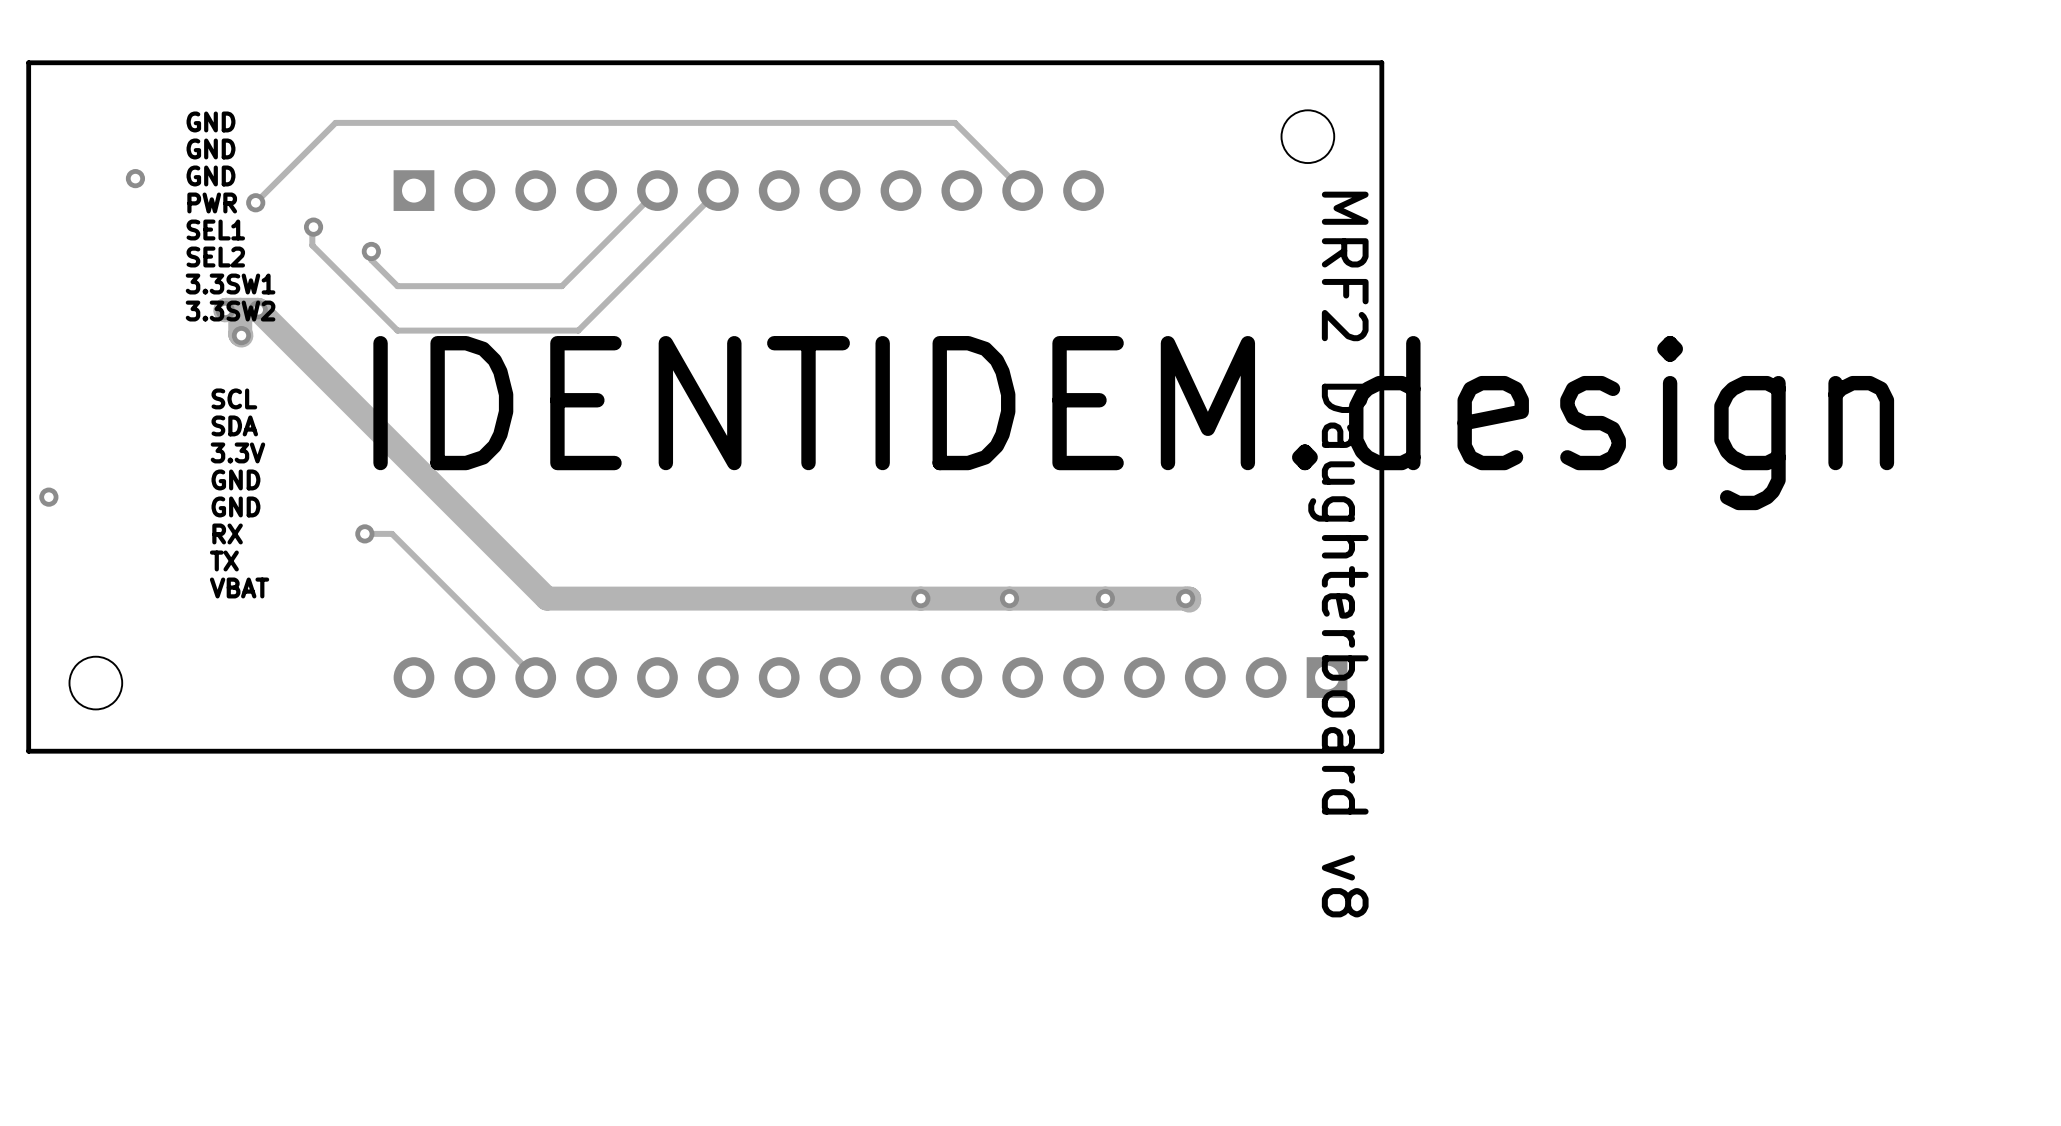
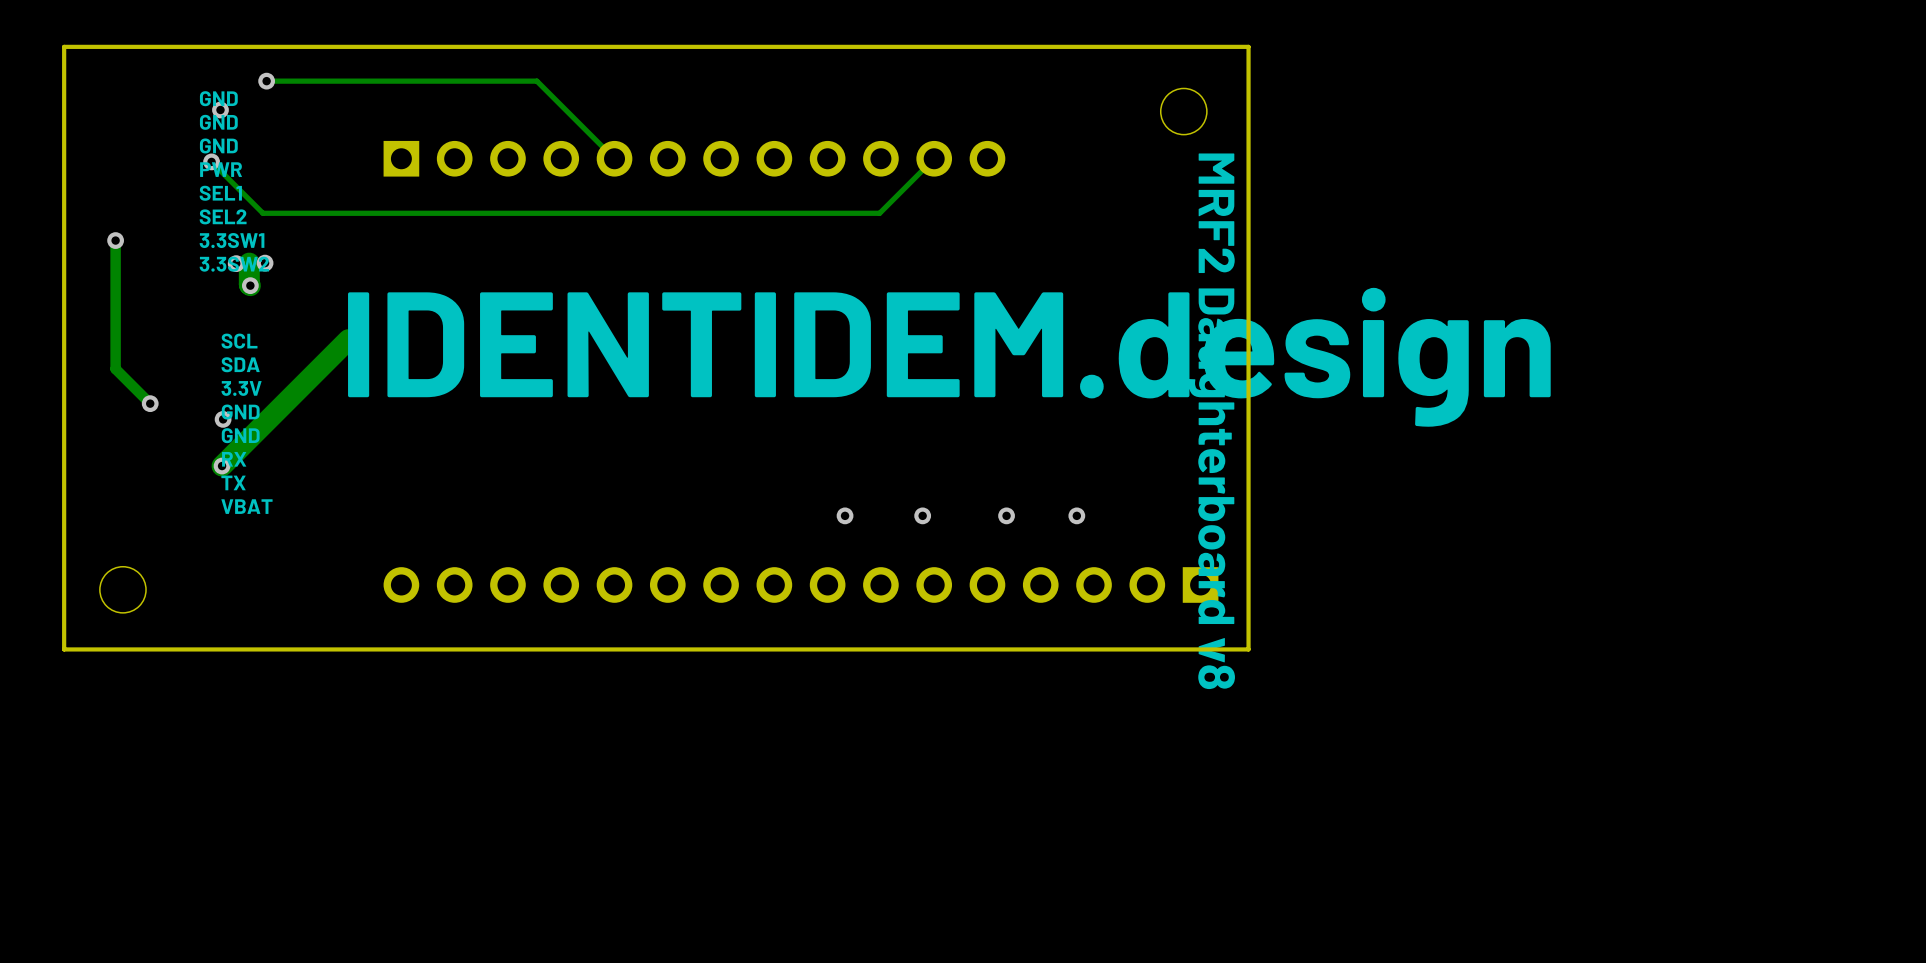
via: none -> (266, 81)
via: none -> (220, 109)
via: (135, 178) -> none
track: (657, 190) (561, 286) (397, 286) (371, 259) (371, 251) -> (614, 158) (536, 81) (266, 81)
track: (718, 190) (578, 330) (397, 330) (312, 245) (313, 227) -> none
track: (1022, 190) (954, 122) (335, 122) (255, 202) -> (934, 158) (879, 213) (262, 213) (211, 161)
via: none -> (211, 161)
via: (255, 202) -> none
via: (313, 227) -> none
via: (371, 251) -> none
track: none -> (115, 240) (115, 369) (150, 403)
via: none -> (115, 240)
track: (225, 310) (258, 309) (546, 598) (1189, 598) (1189, 600) -> none
track: none -> (348, 339) (222, 466)
via: none -> (150, 403)
via: none -> (223, 419)
via: (48, 497) -> none
track: (364, 533) (392, 533) (535, 677) -> none
via: (364, 533) -> none
via: none -> (222, 466)

